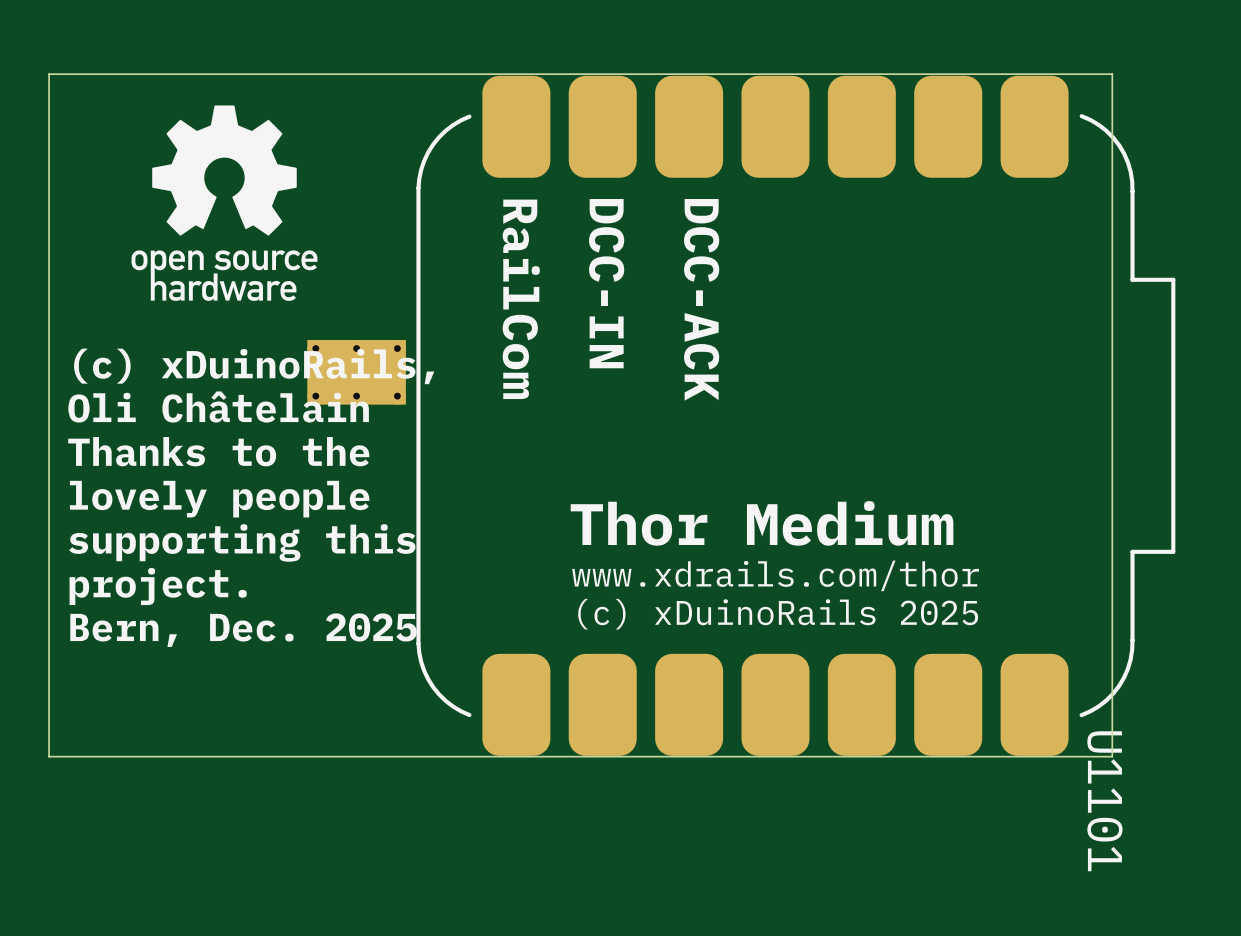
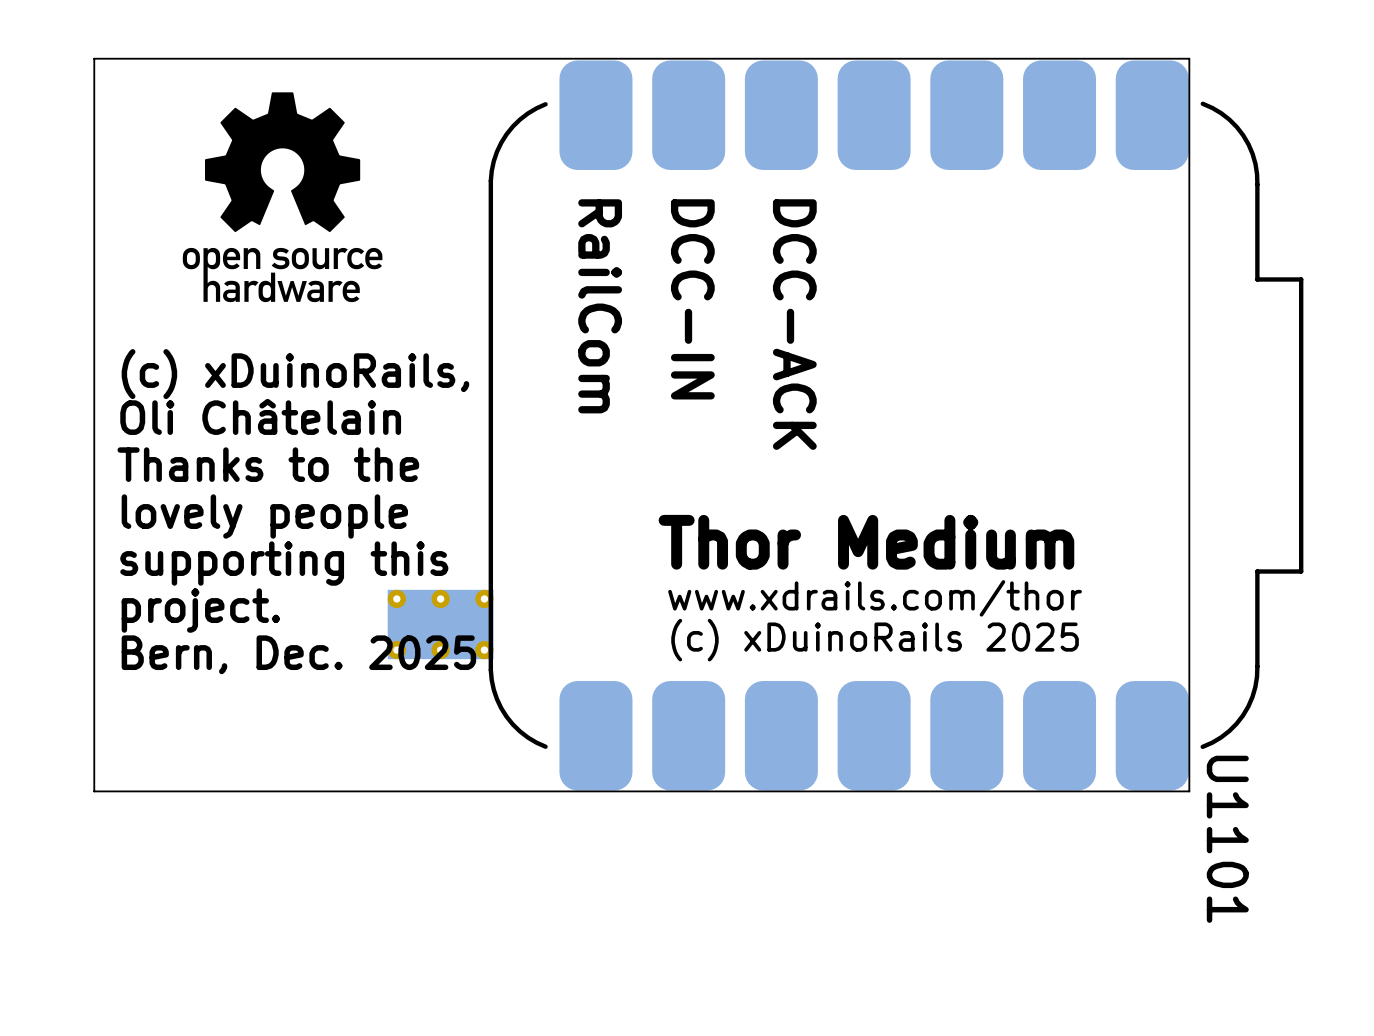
board edge: (1069, 74) (1112, 74) (1112, 756) (1069, 756) -> (1189, 58) (1189, 791)
part position: (356, 372) -> (440, 624)

